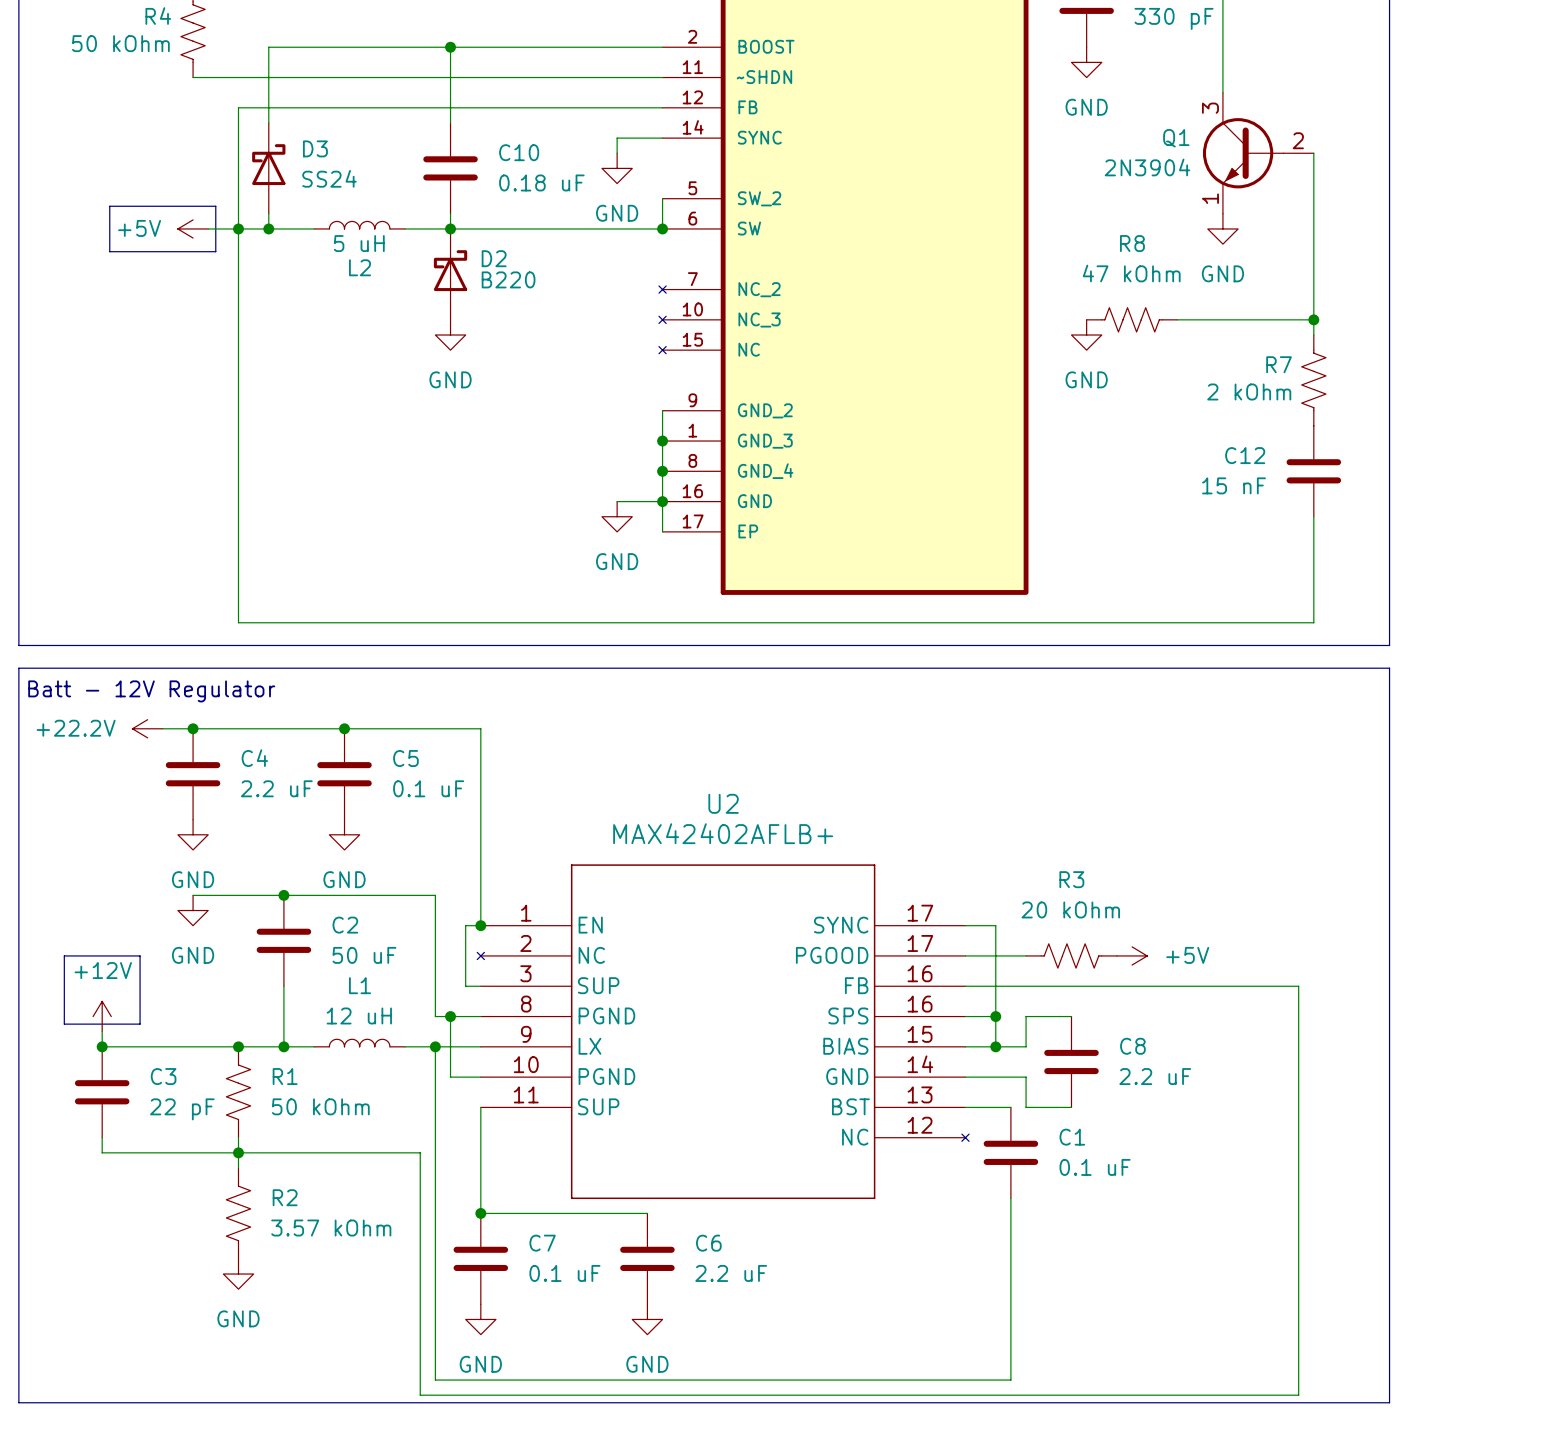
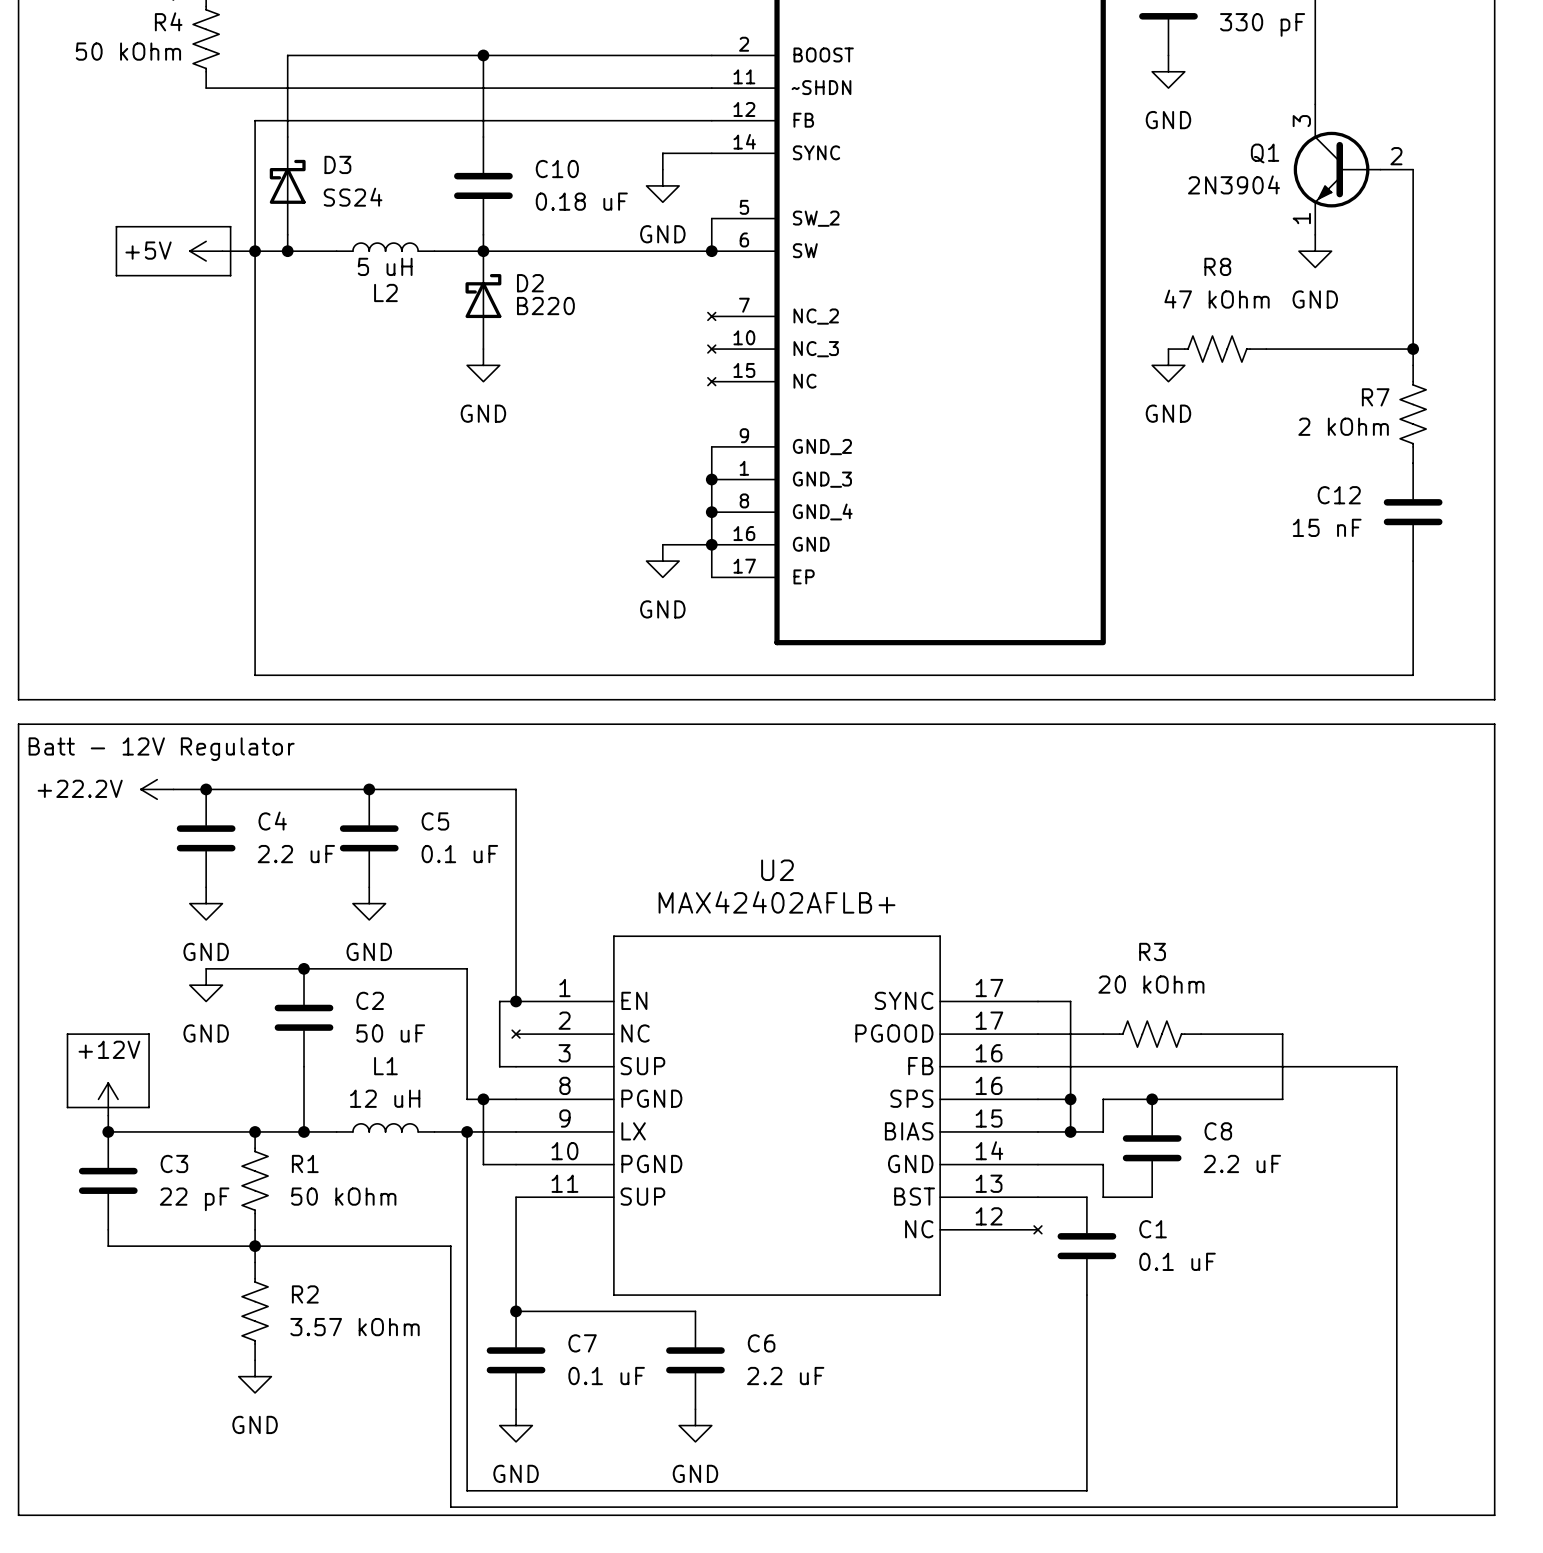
wire: none -> (1201, 1034) (1282, 1034) (1282, 1099) (1152, 1099)
power symbol: +5V (1132, 955) -> none
junction: none -> (1152, 1099)

